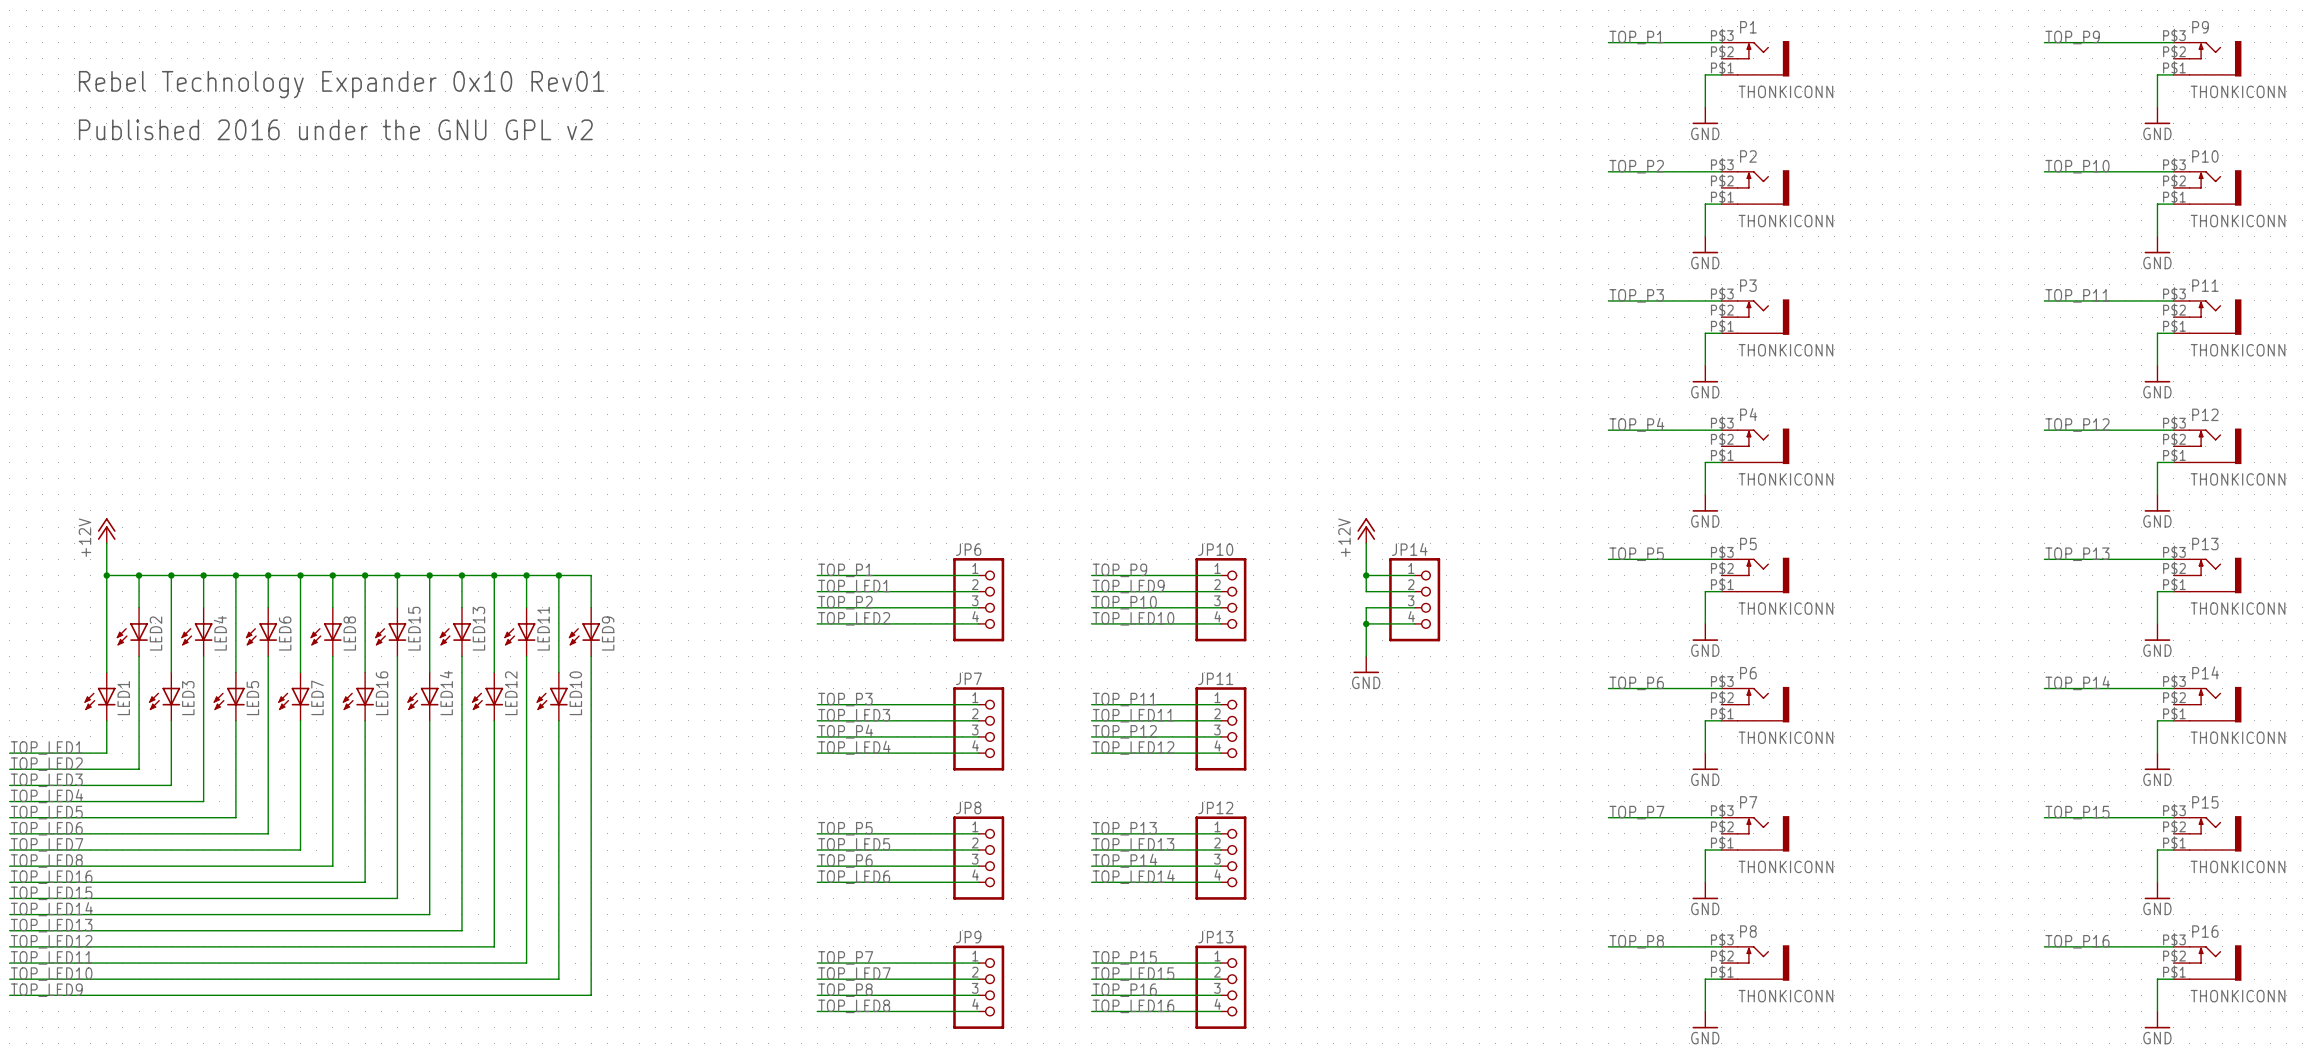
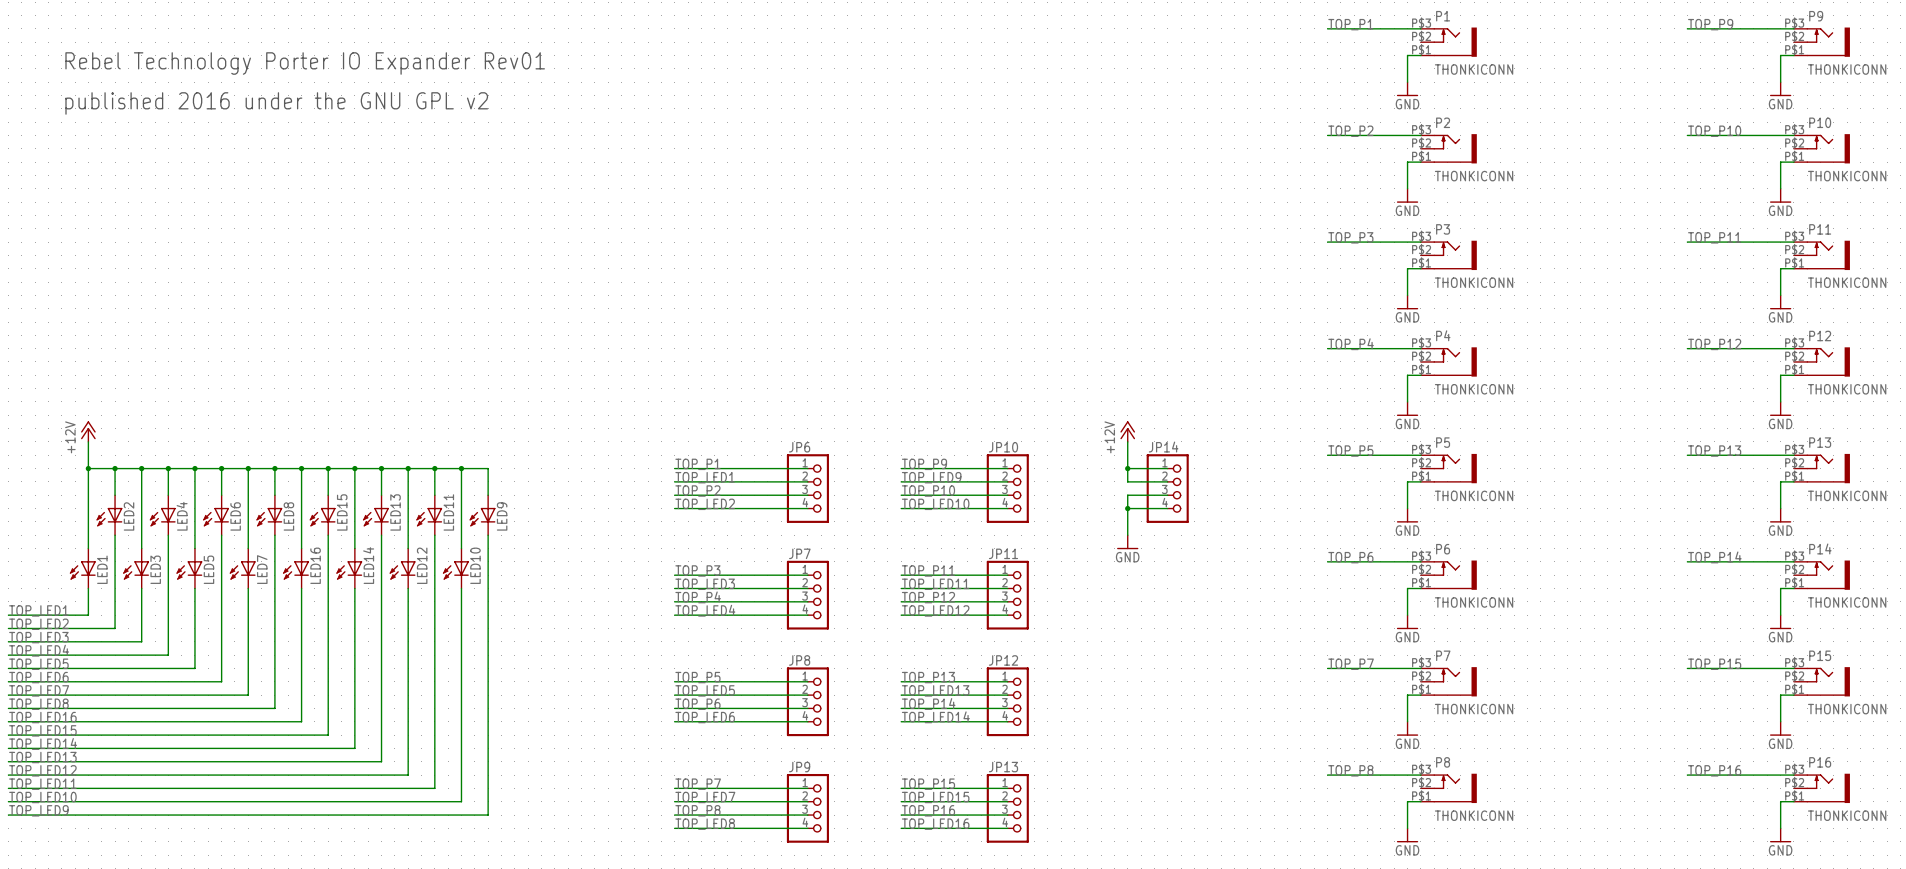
text: Rebel Technology Expander 0x10 Rev01 (341, 84) -> Rebel Technology Porter IO Expander Rev01 (305, 63)
text: Published 2016 under the GNU GPL v2 (335, 129) -> published 2016 under the GNU GPL v2 (276, 103)

